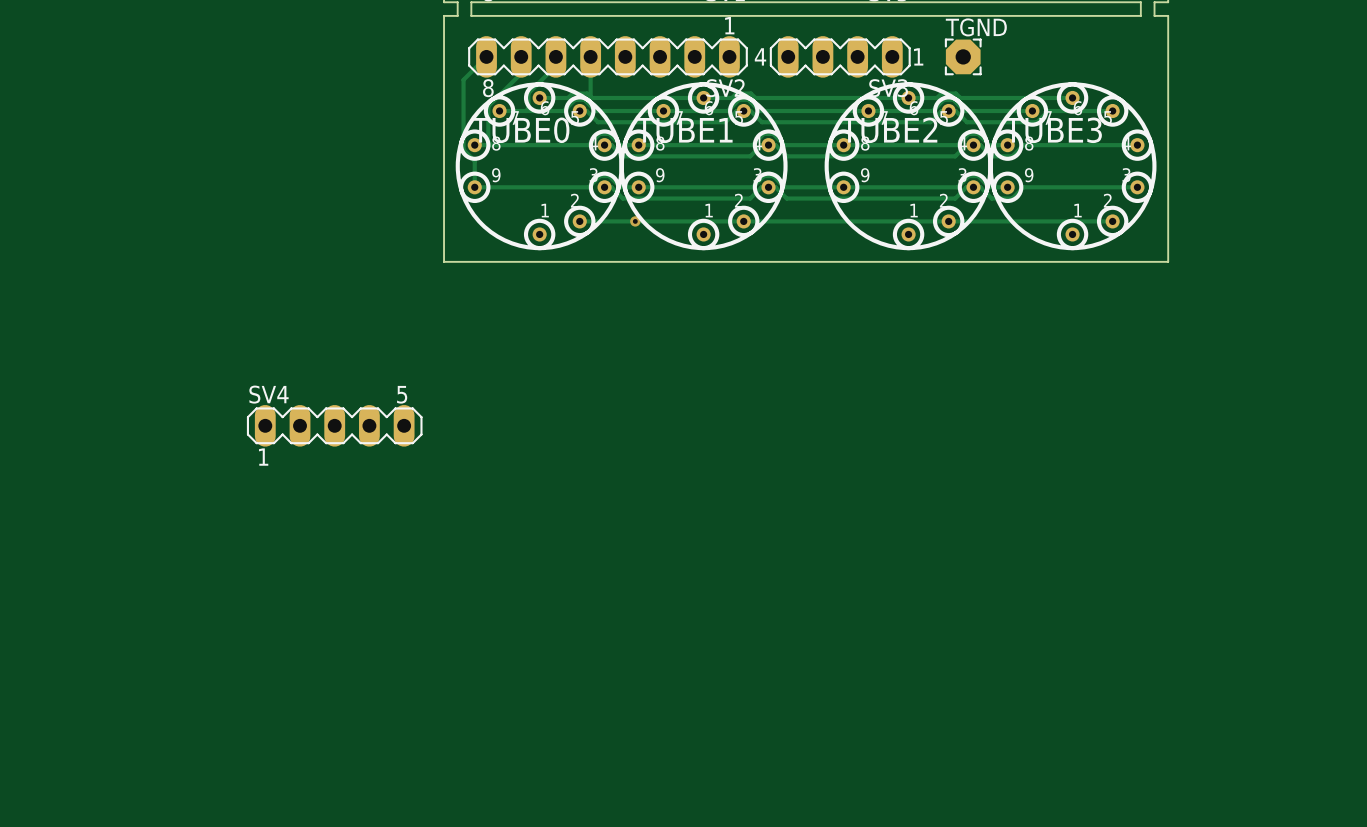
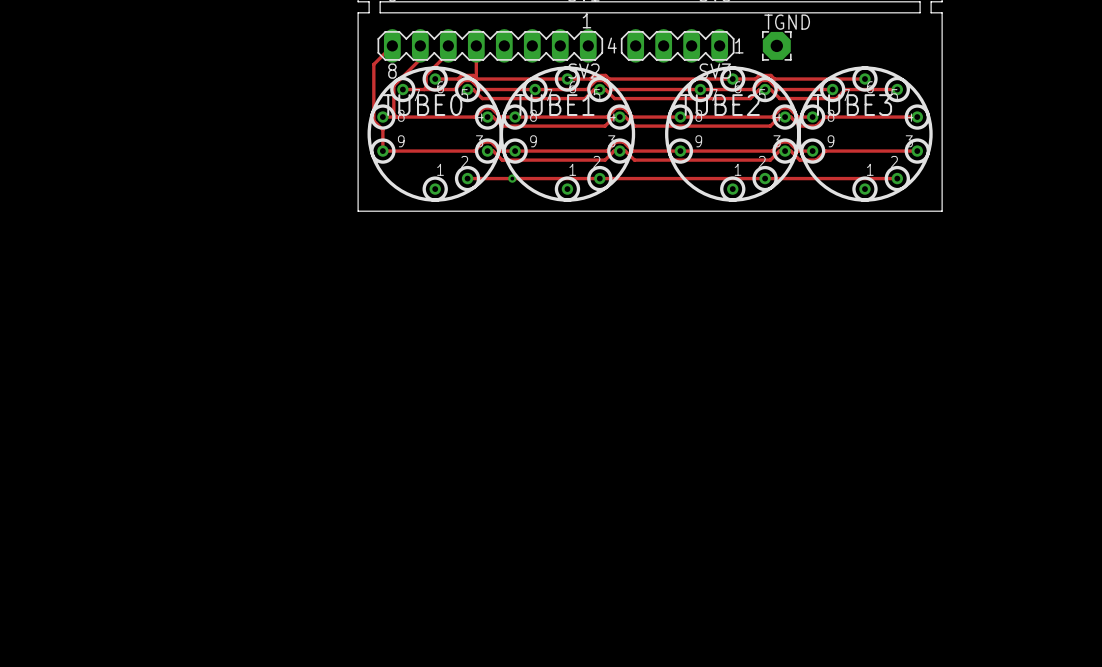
SV4: (334, 425) -> none

